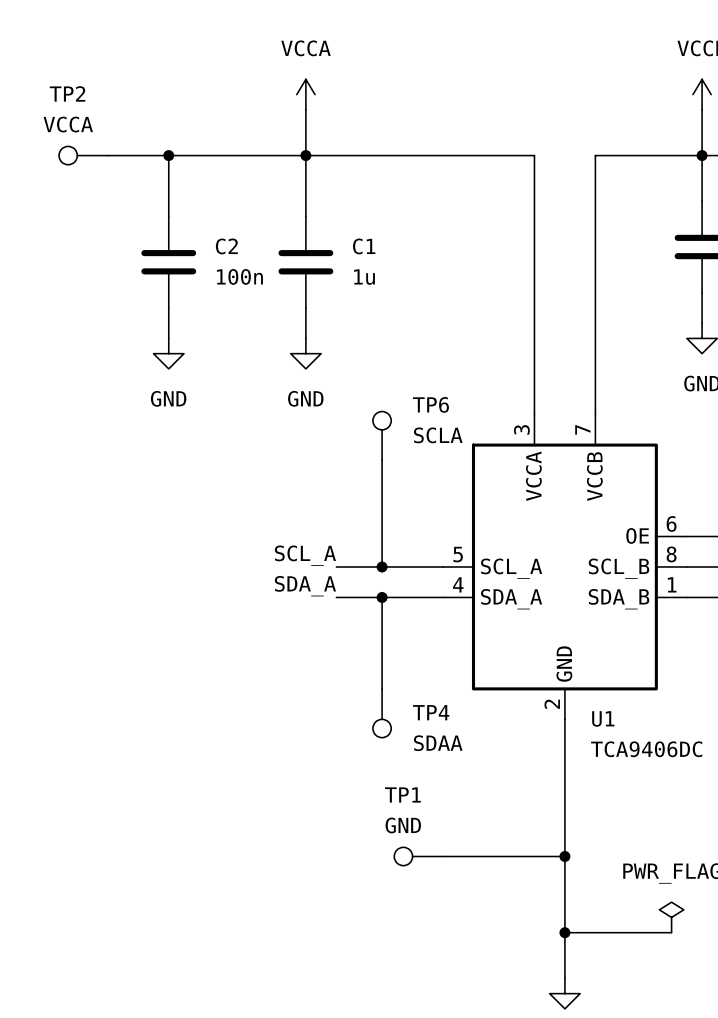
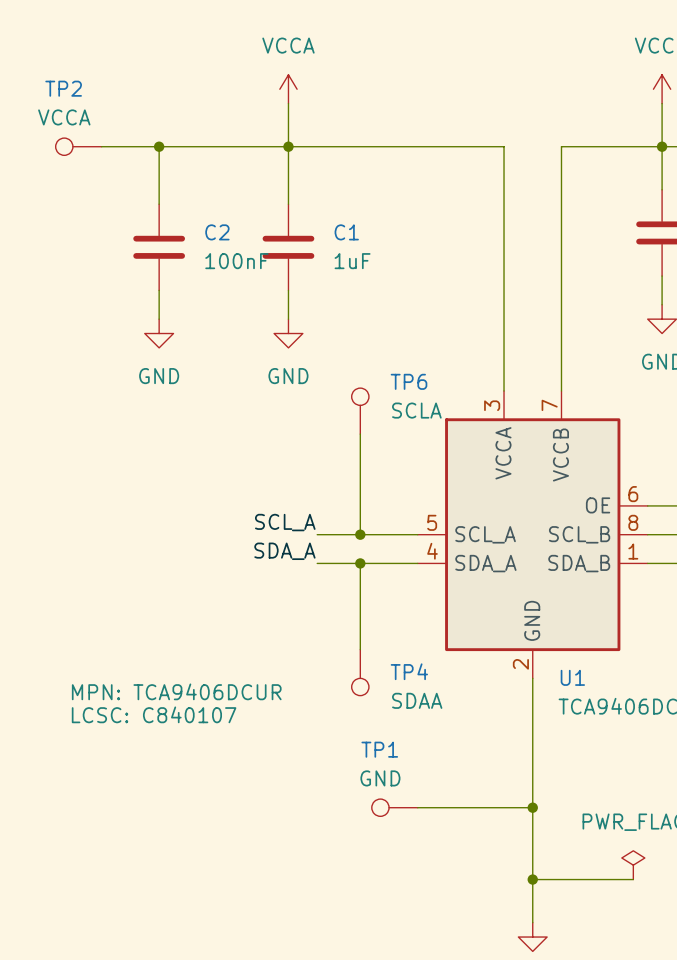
C2 value: 100n (239, 276) -> 100nF (236, 261)
C1 value: 1u (364, 277) -> 1uF (352, 261)
U1 text: none -> MPN: TCA9406DCUR (176, 691)
U1 text: none -> LCSC: C840107 (154, 714)

